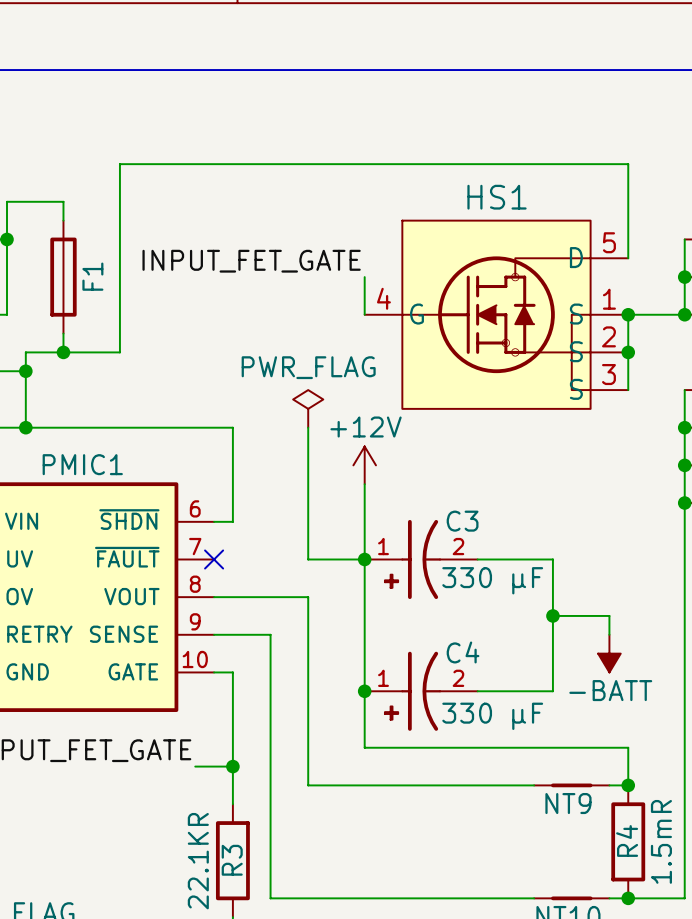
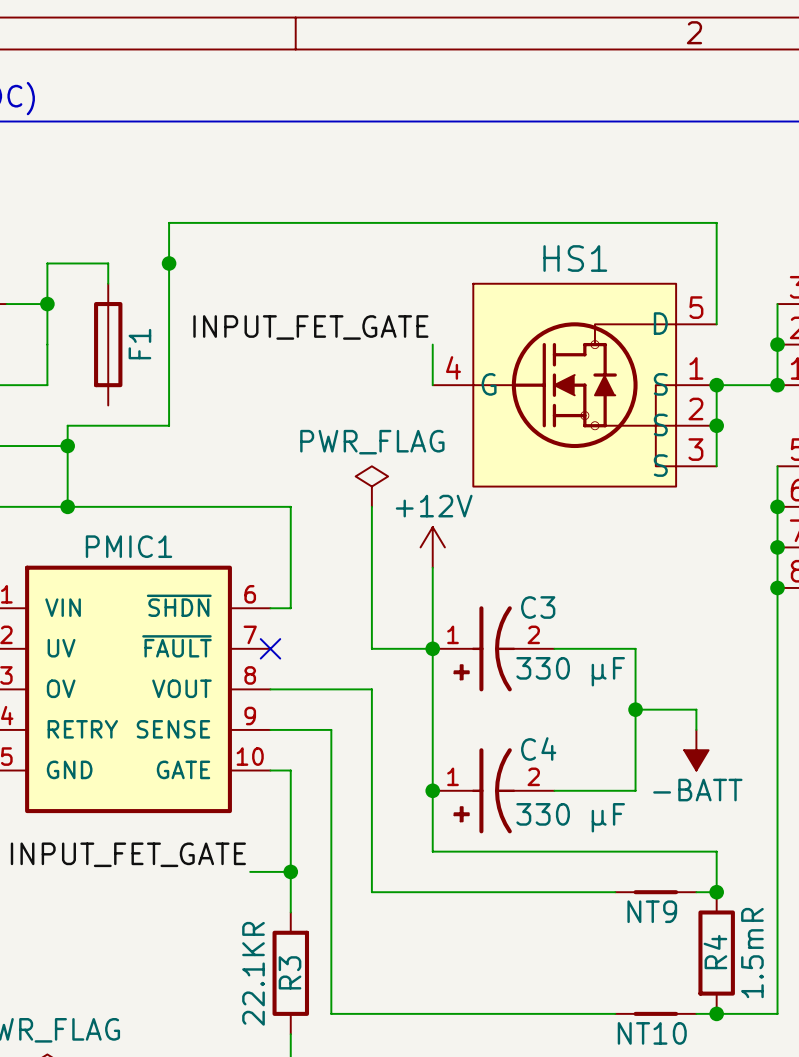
junction: none -> (169, 263)
wire: (63, 333) (63, 352) -> none
junction: (63, 352) -> none

